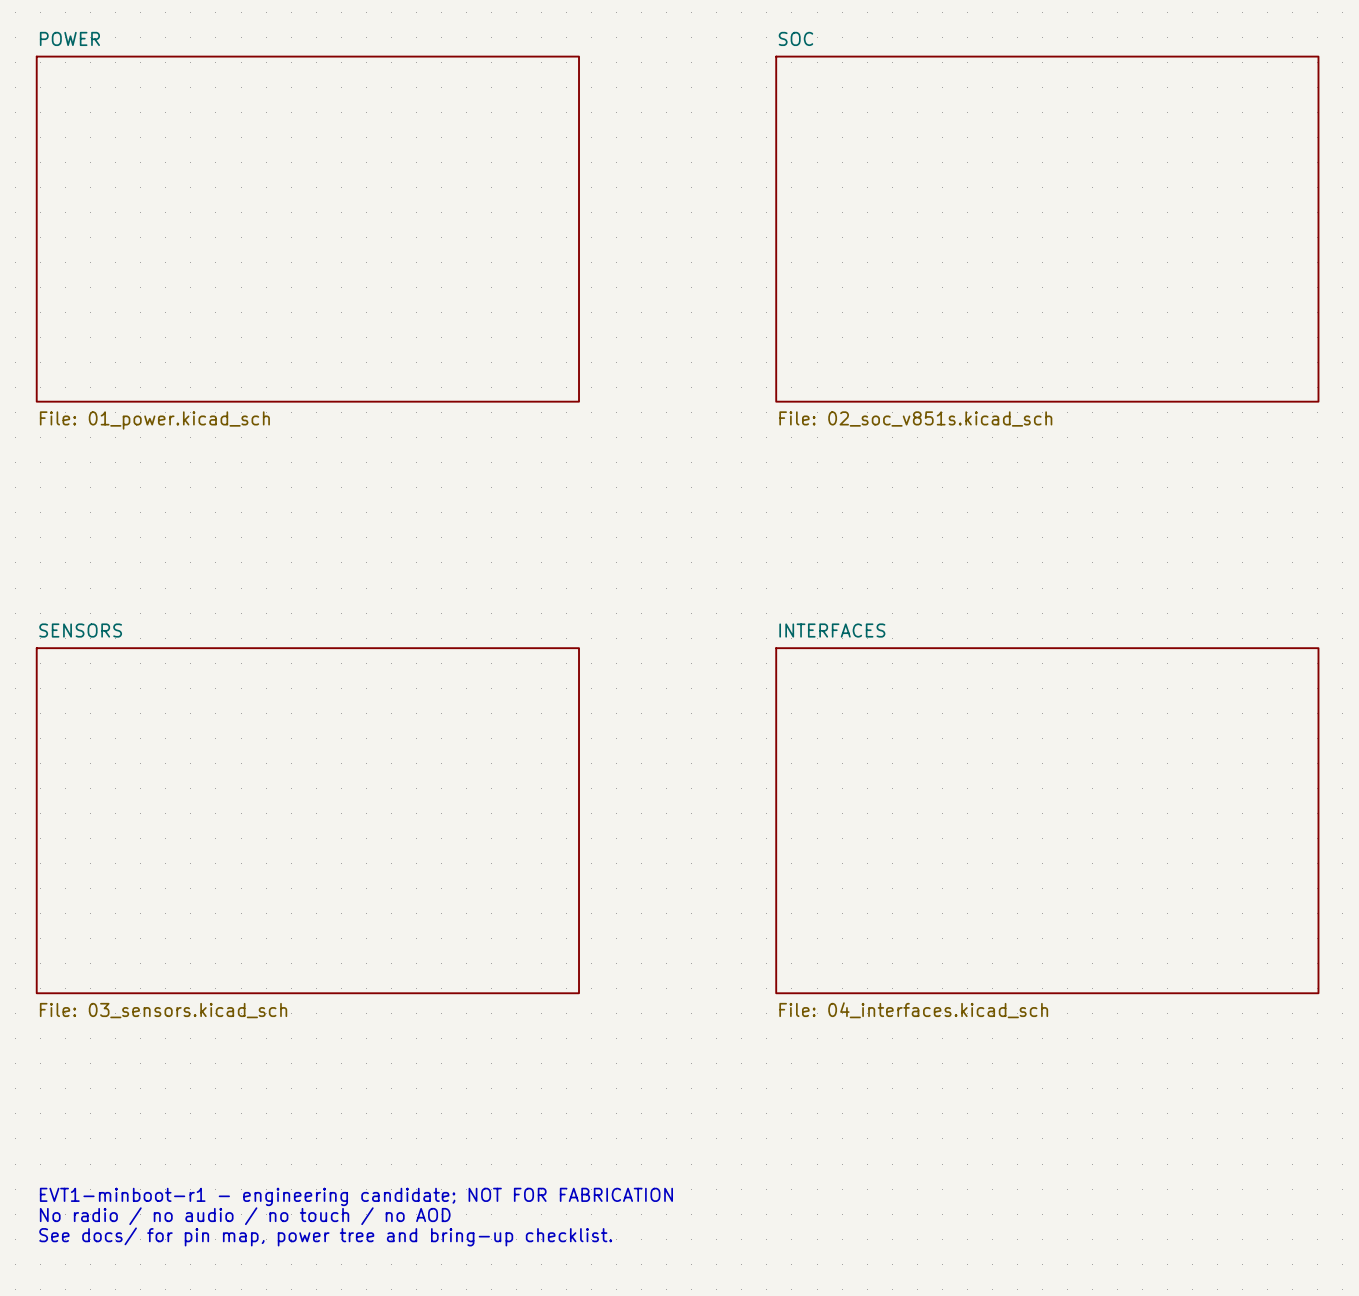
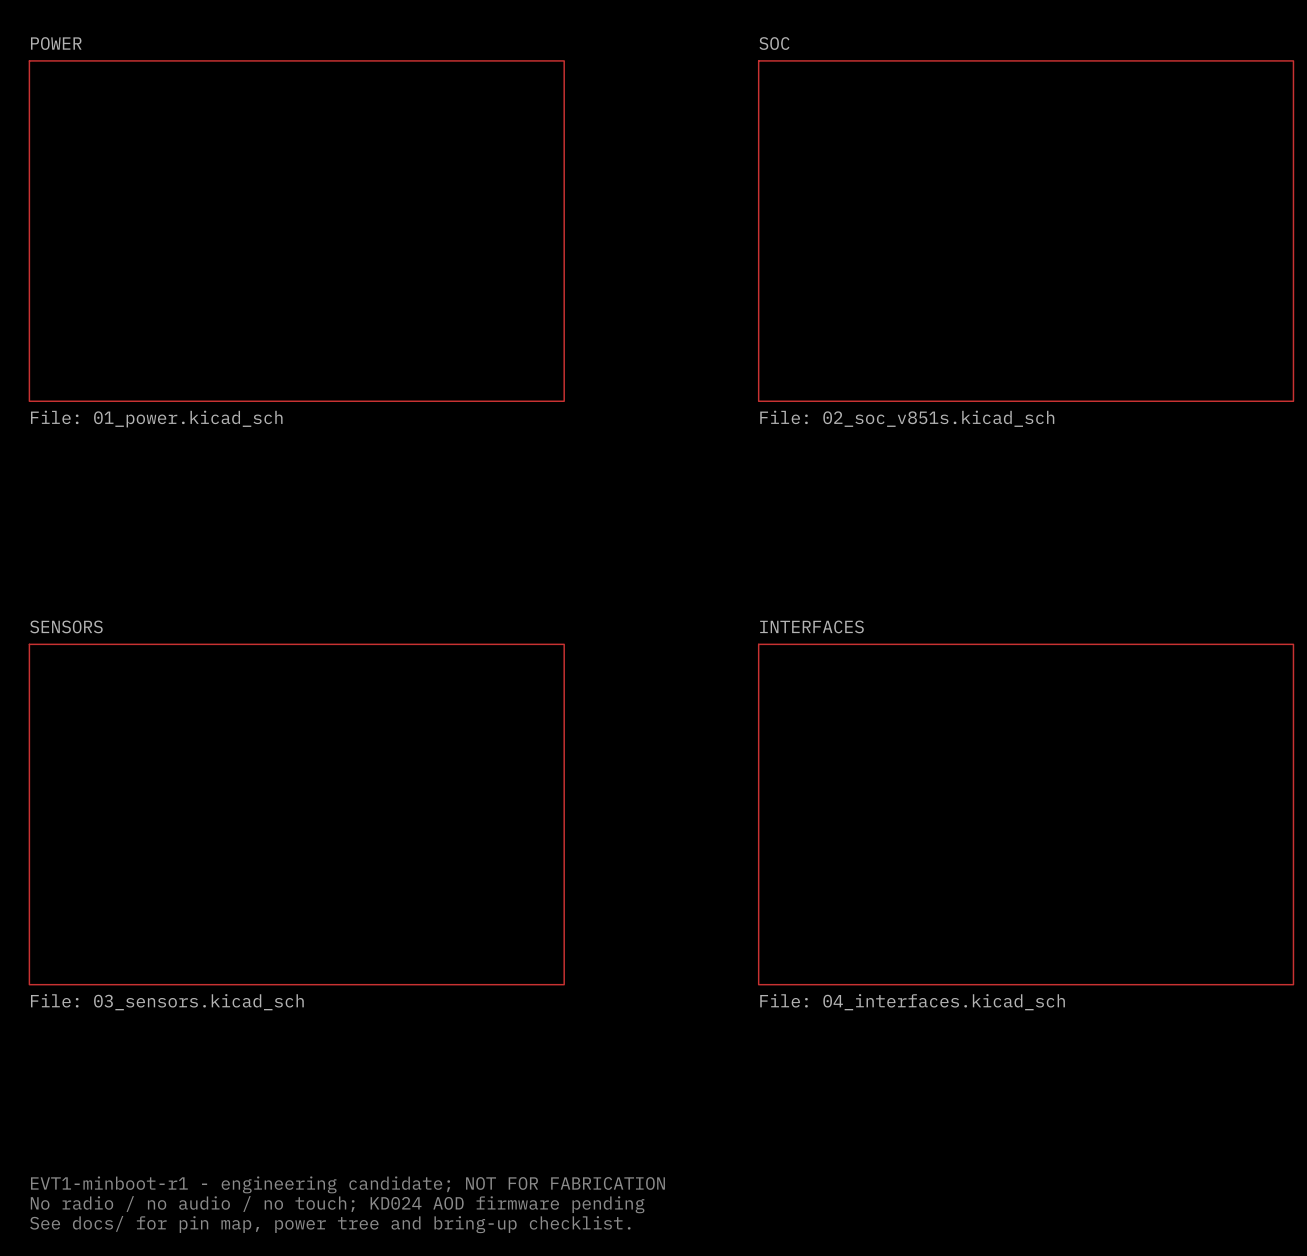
text: No radio / no audio / no touch / no AOD (245, 1216) -> No radio / no audio / no touch; KD024 AOD firmware pending (337, 1204)

